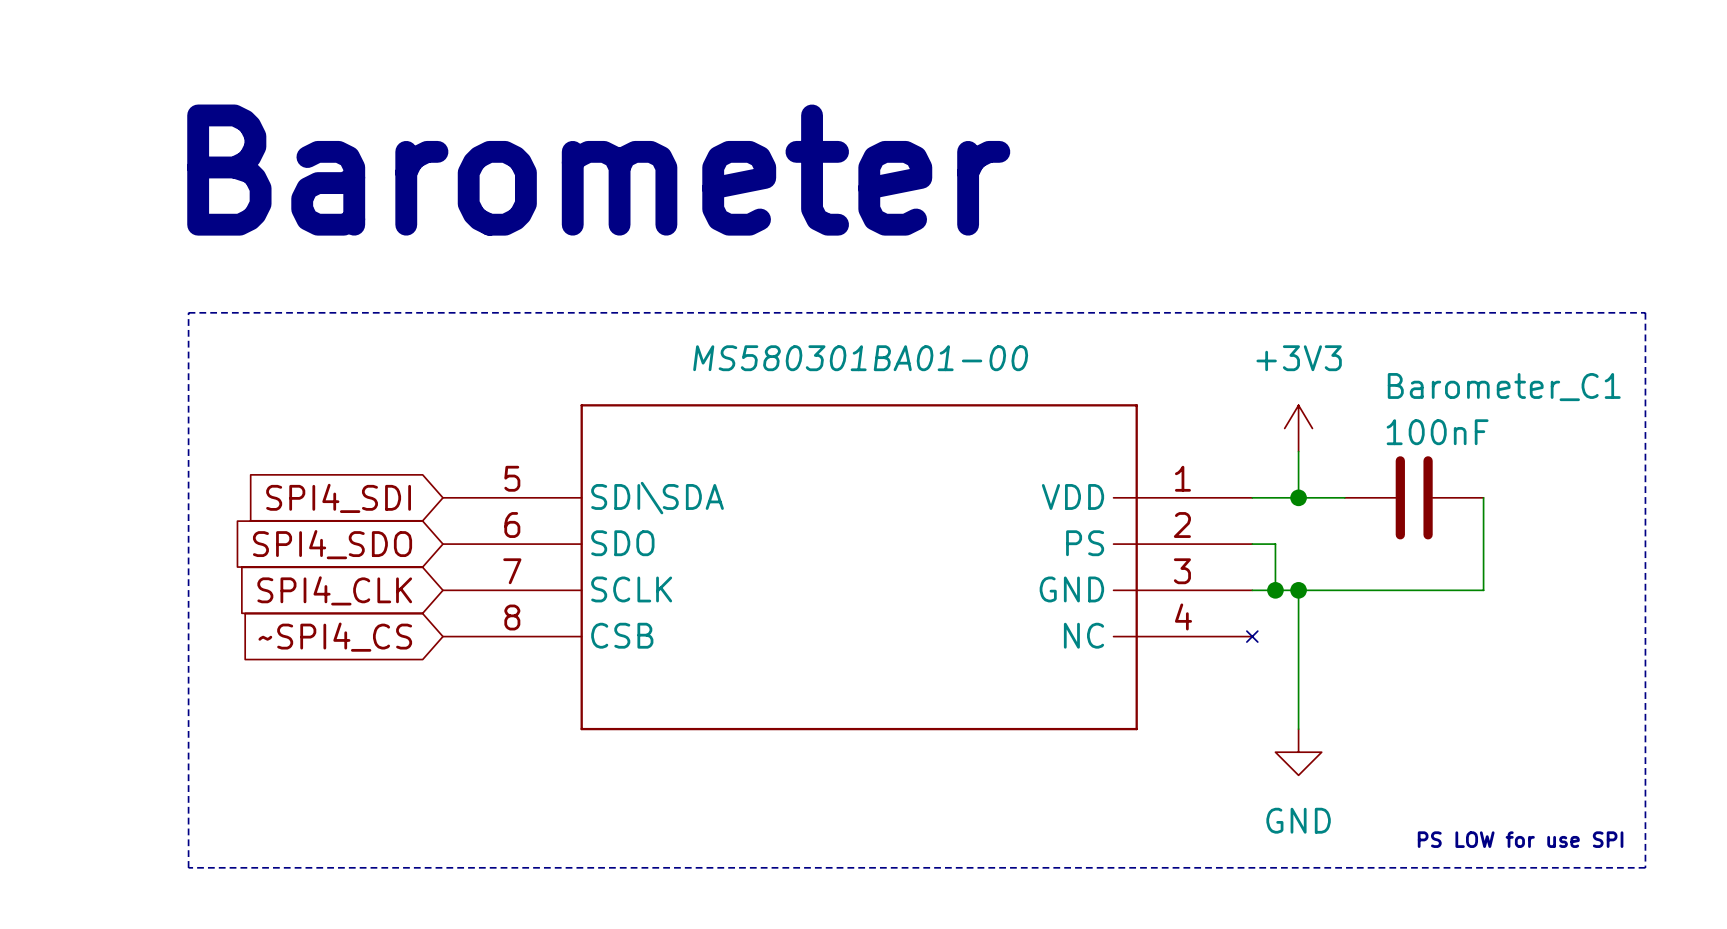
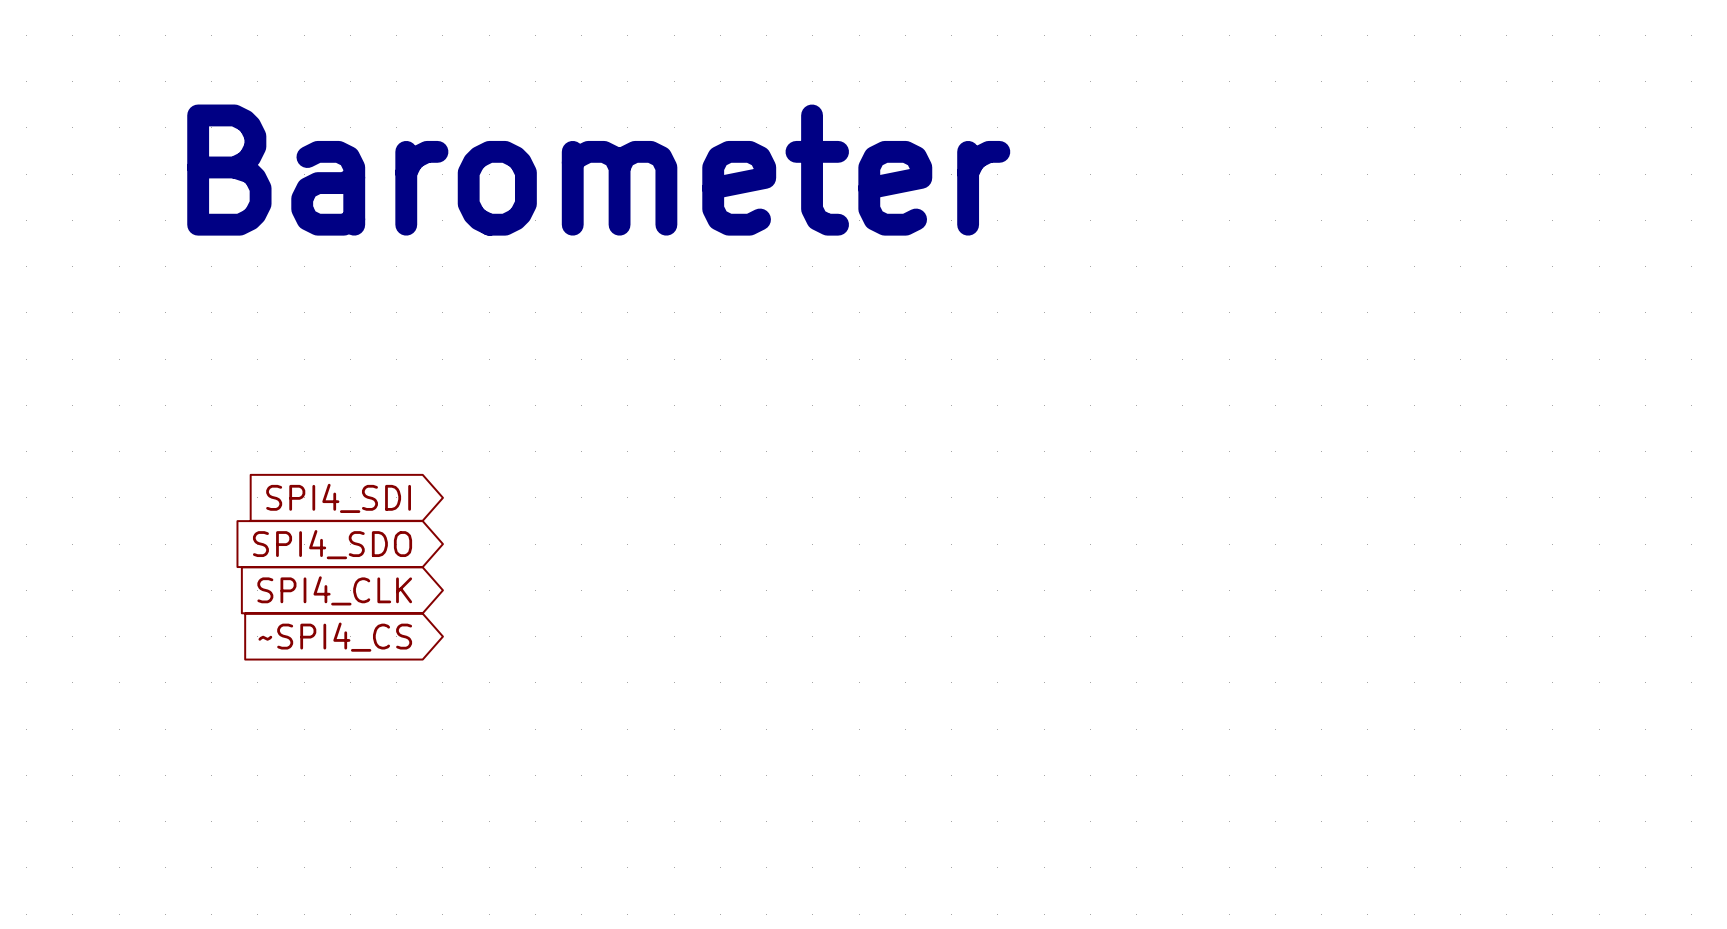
line: (188, 312) (1645, 312) (1645, 867) (188, 867) (188, 312) -> none
power symbol: +3V3 (1298, 428) -> none
wire: (1298, 451) (1298, 497) -> none
wire: (1252, 497) (1344, 497) -> none
junction: (1298, 497) -> none
Barometer_C1: 100nF (1414, 497) -> none
wire: (1483, 497) (1483, 590) (1252, 590) -> none
wire: (1252, 544) (1275, 544) (1275, 590) -> none
part: (850, 567) -> none
junction: (1275, 590) -> none
wire: (1298, 590) (1298, 729) -> none
junction: (1298, 590) -> none
power symbol: GND (1298, 752) -> none
text: PS LOW for use SPI (1520, 839) -> none

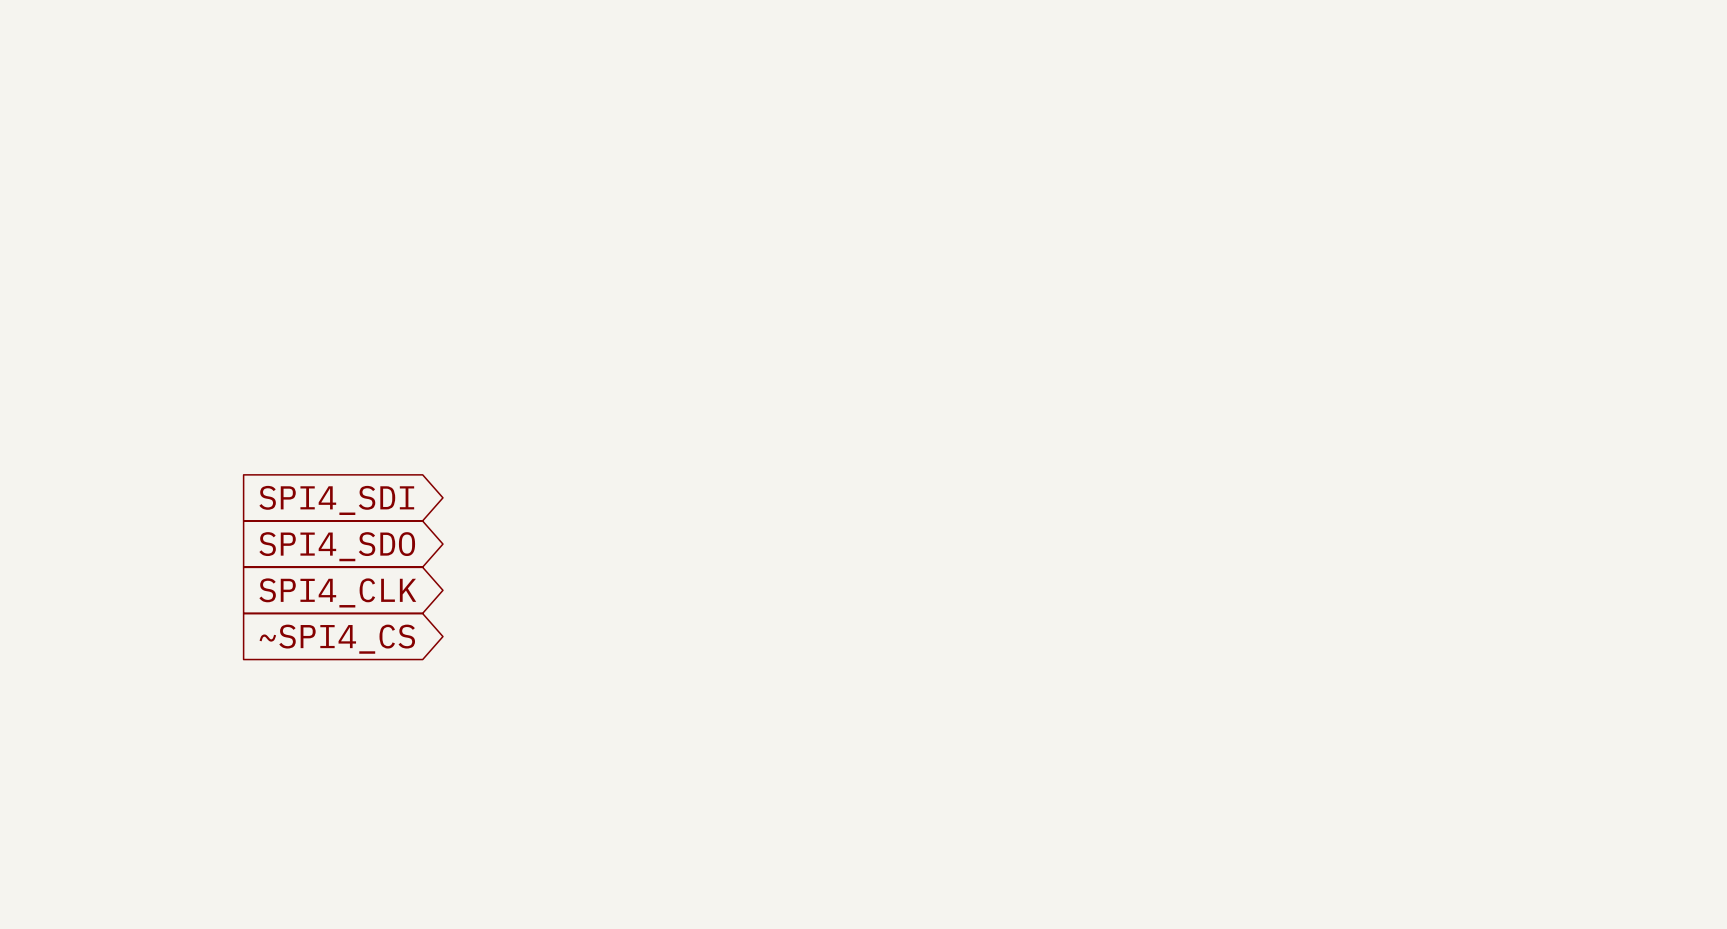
text: Barometer (598, 170) -> none

